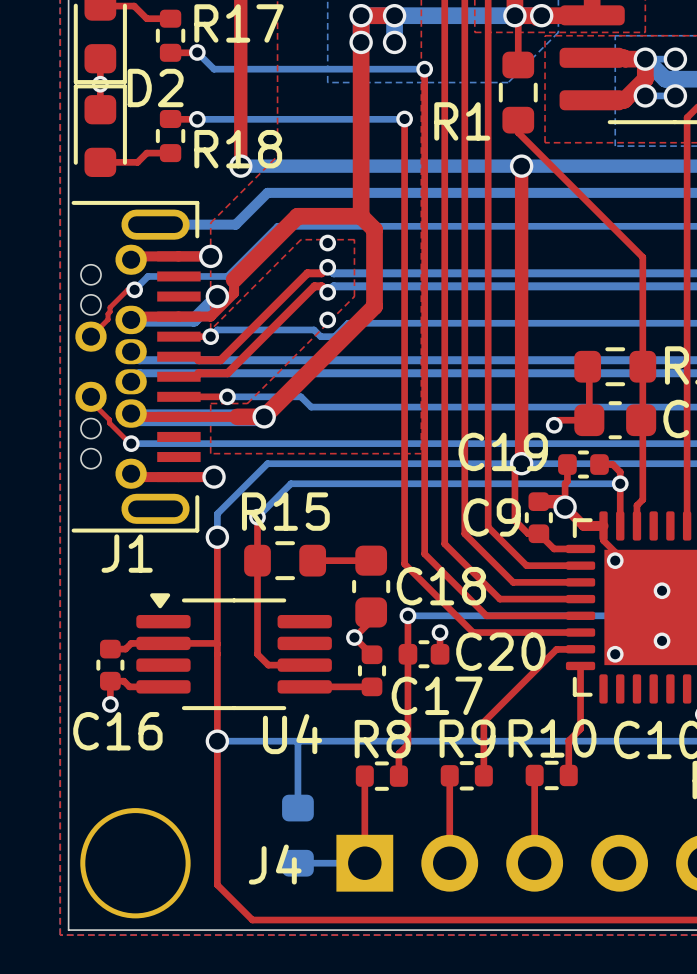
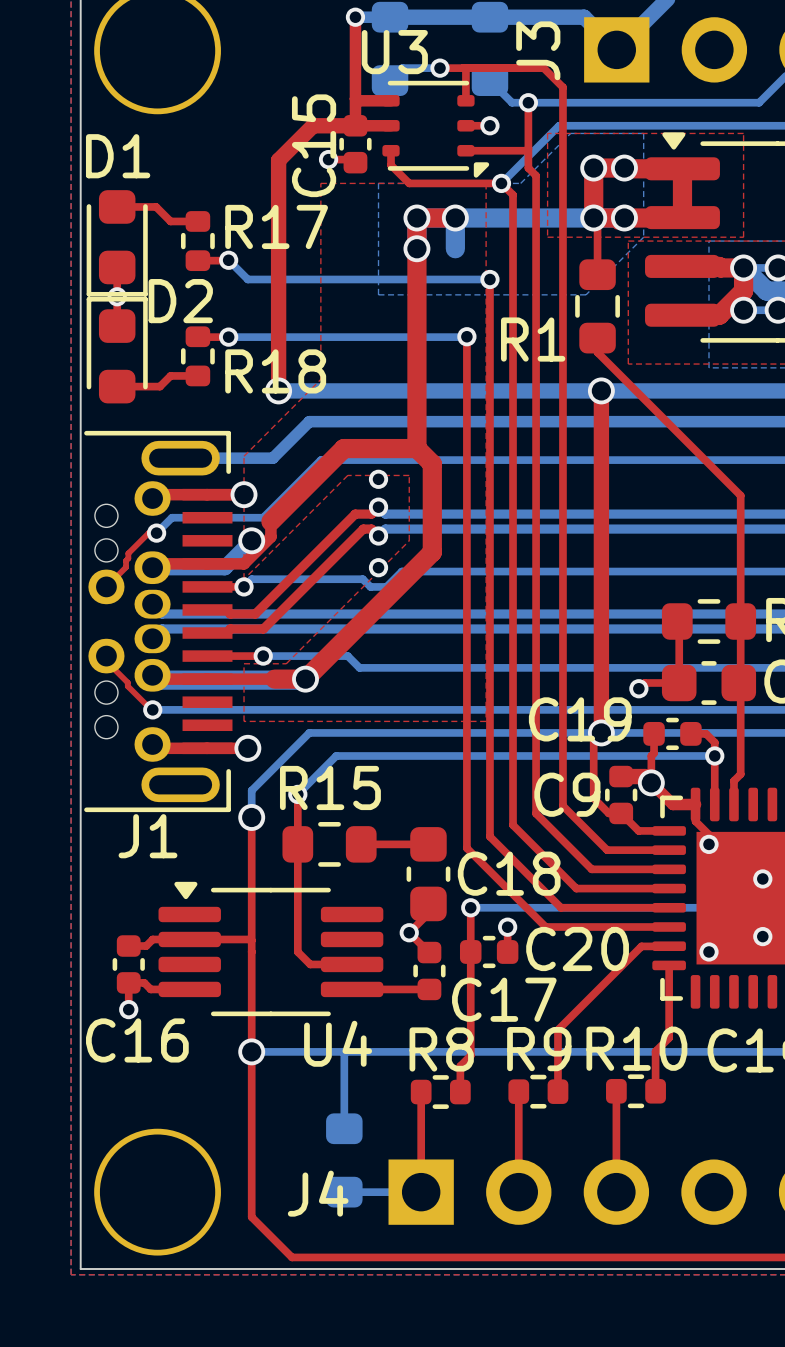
via: (394, 42) -> none

